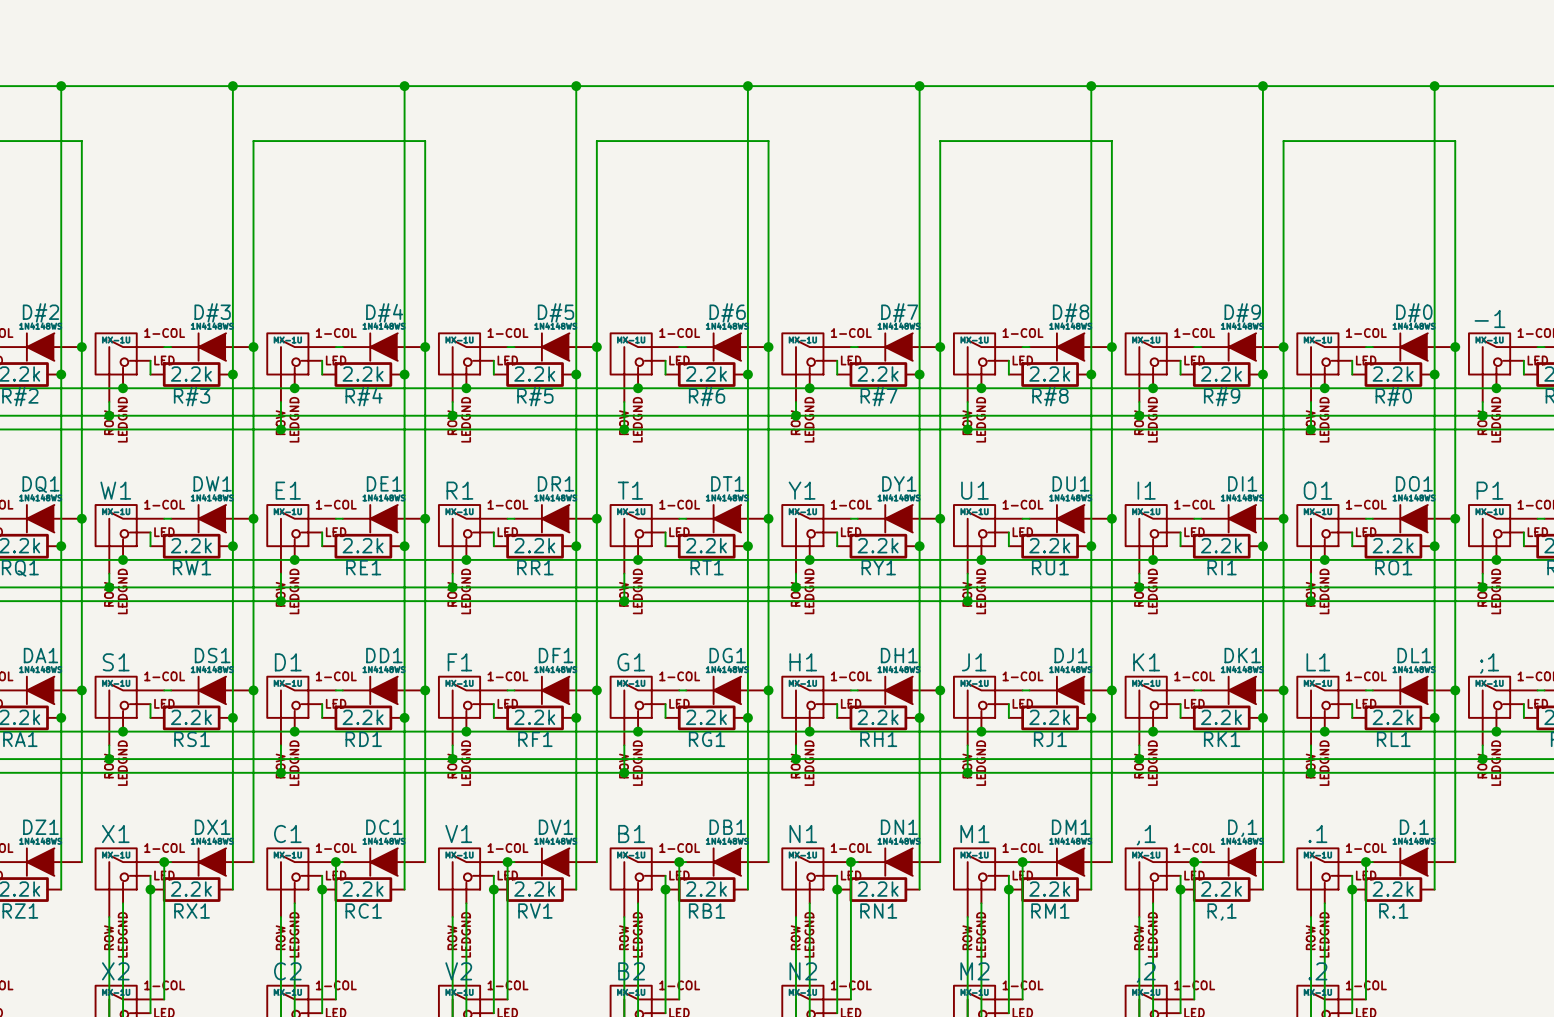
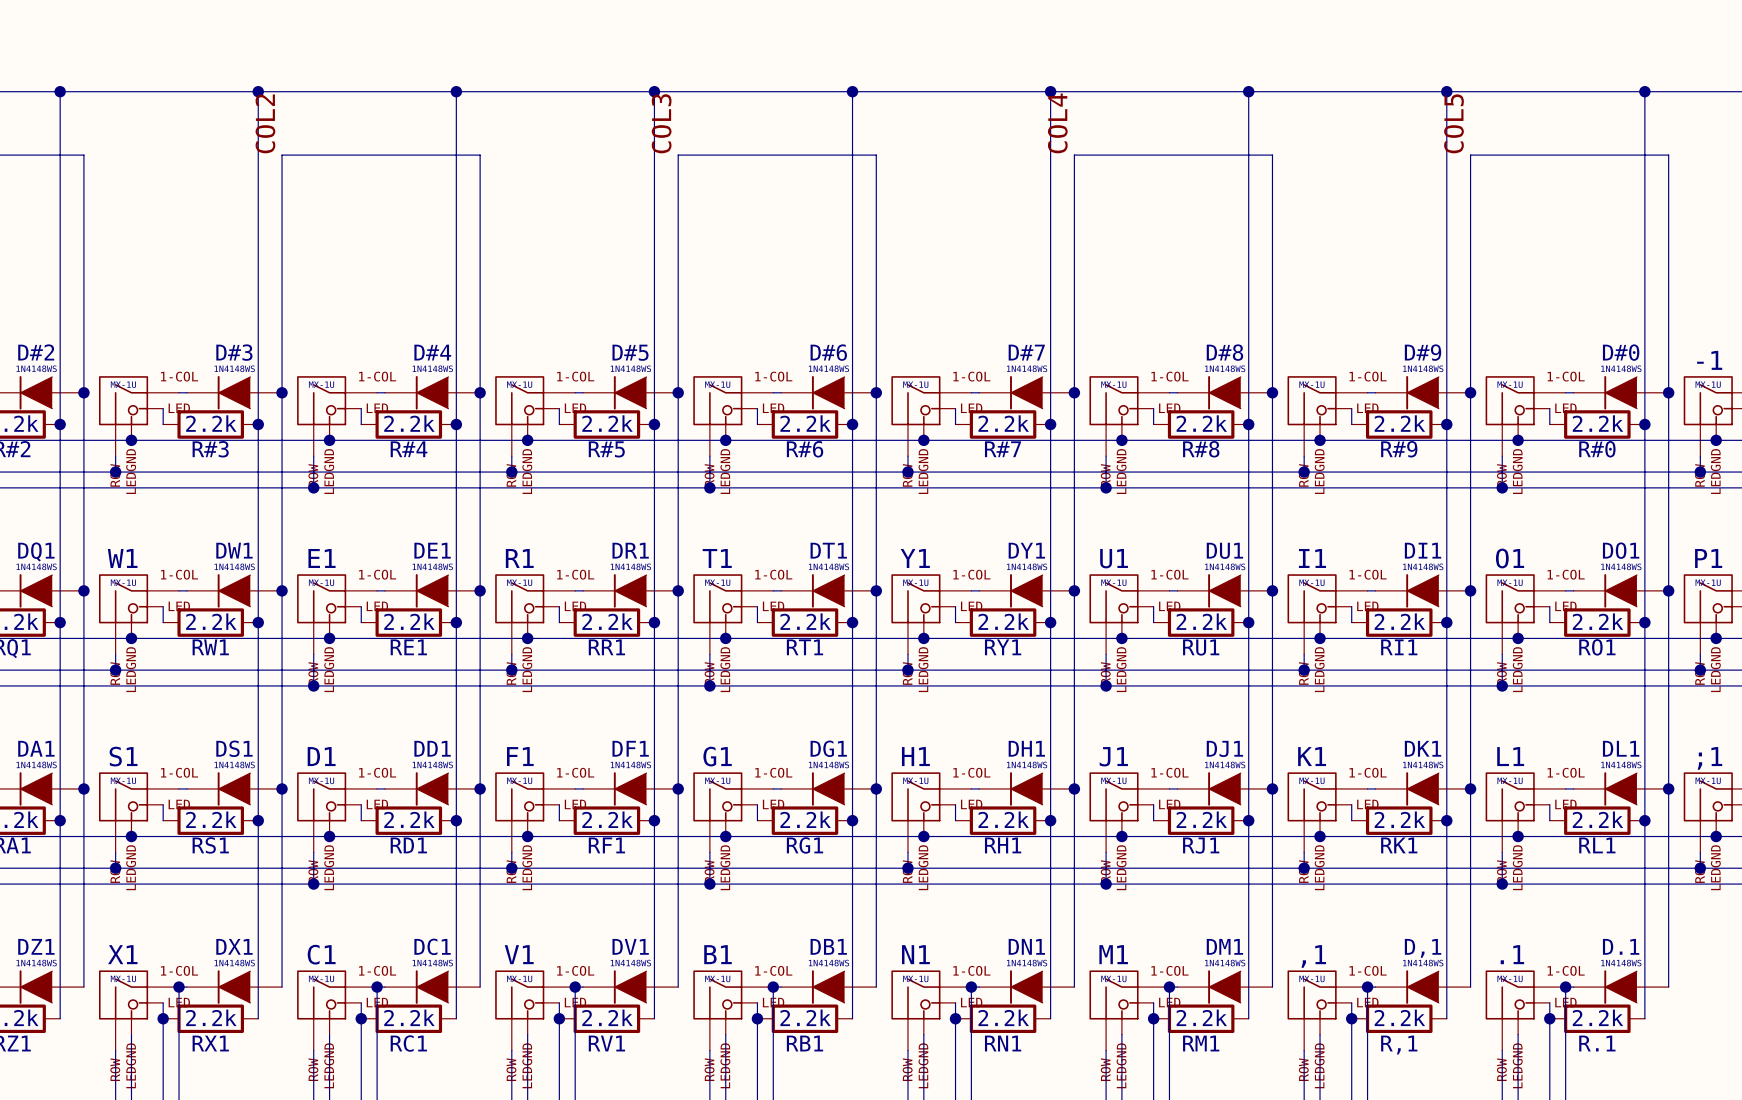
label: none -> COL2 (265, 123)
label: none -> COL3 (661, 123)
label: none -> COL4 (1057, 123)
label: none -> COL5 (1453, 123)

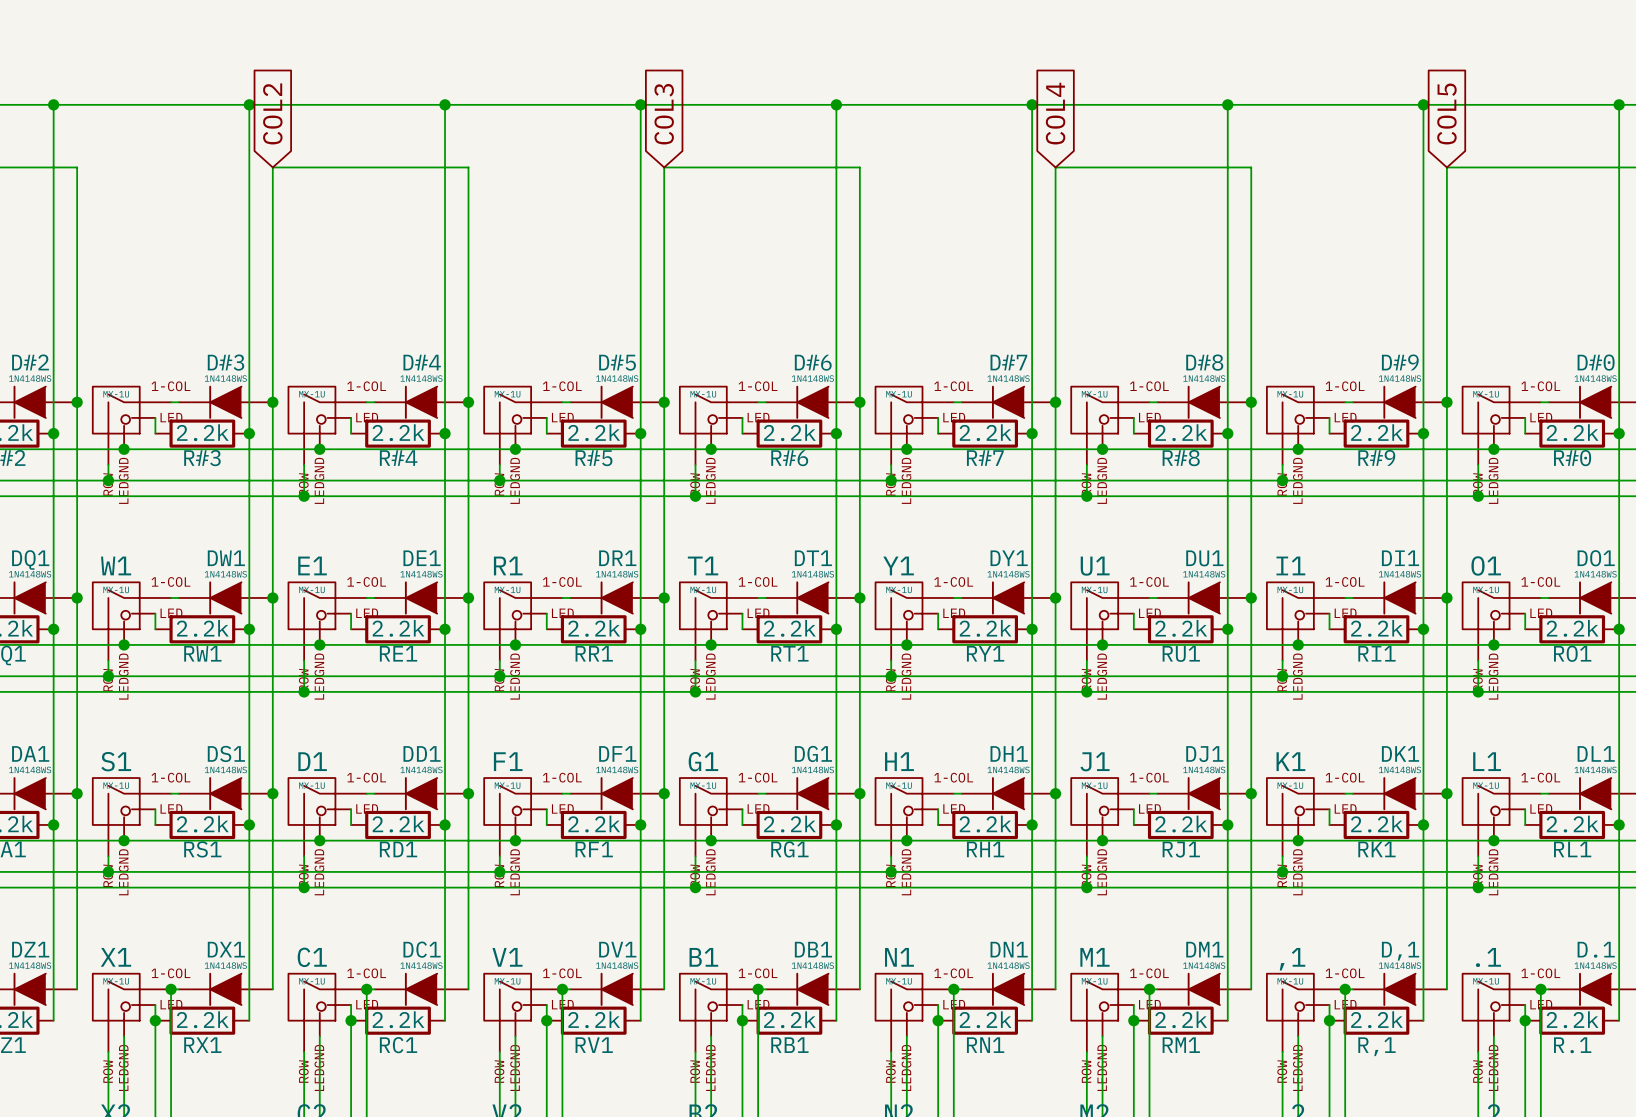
global label: none -> COL2 (272, 113)
global label: none -> COL3 (664, 114)
global label: none -> COL4 (1055, 113)
global label: none -> COL5 (1446, 113)
label: COL2 (265, 123) -> none
label: COL3 (661, 123) -> none
label: COL4 (1057, 123) -> none
label: COL5 (1453, 123) -> none

